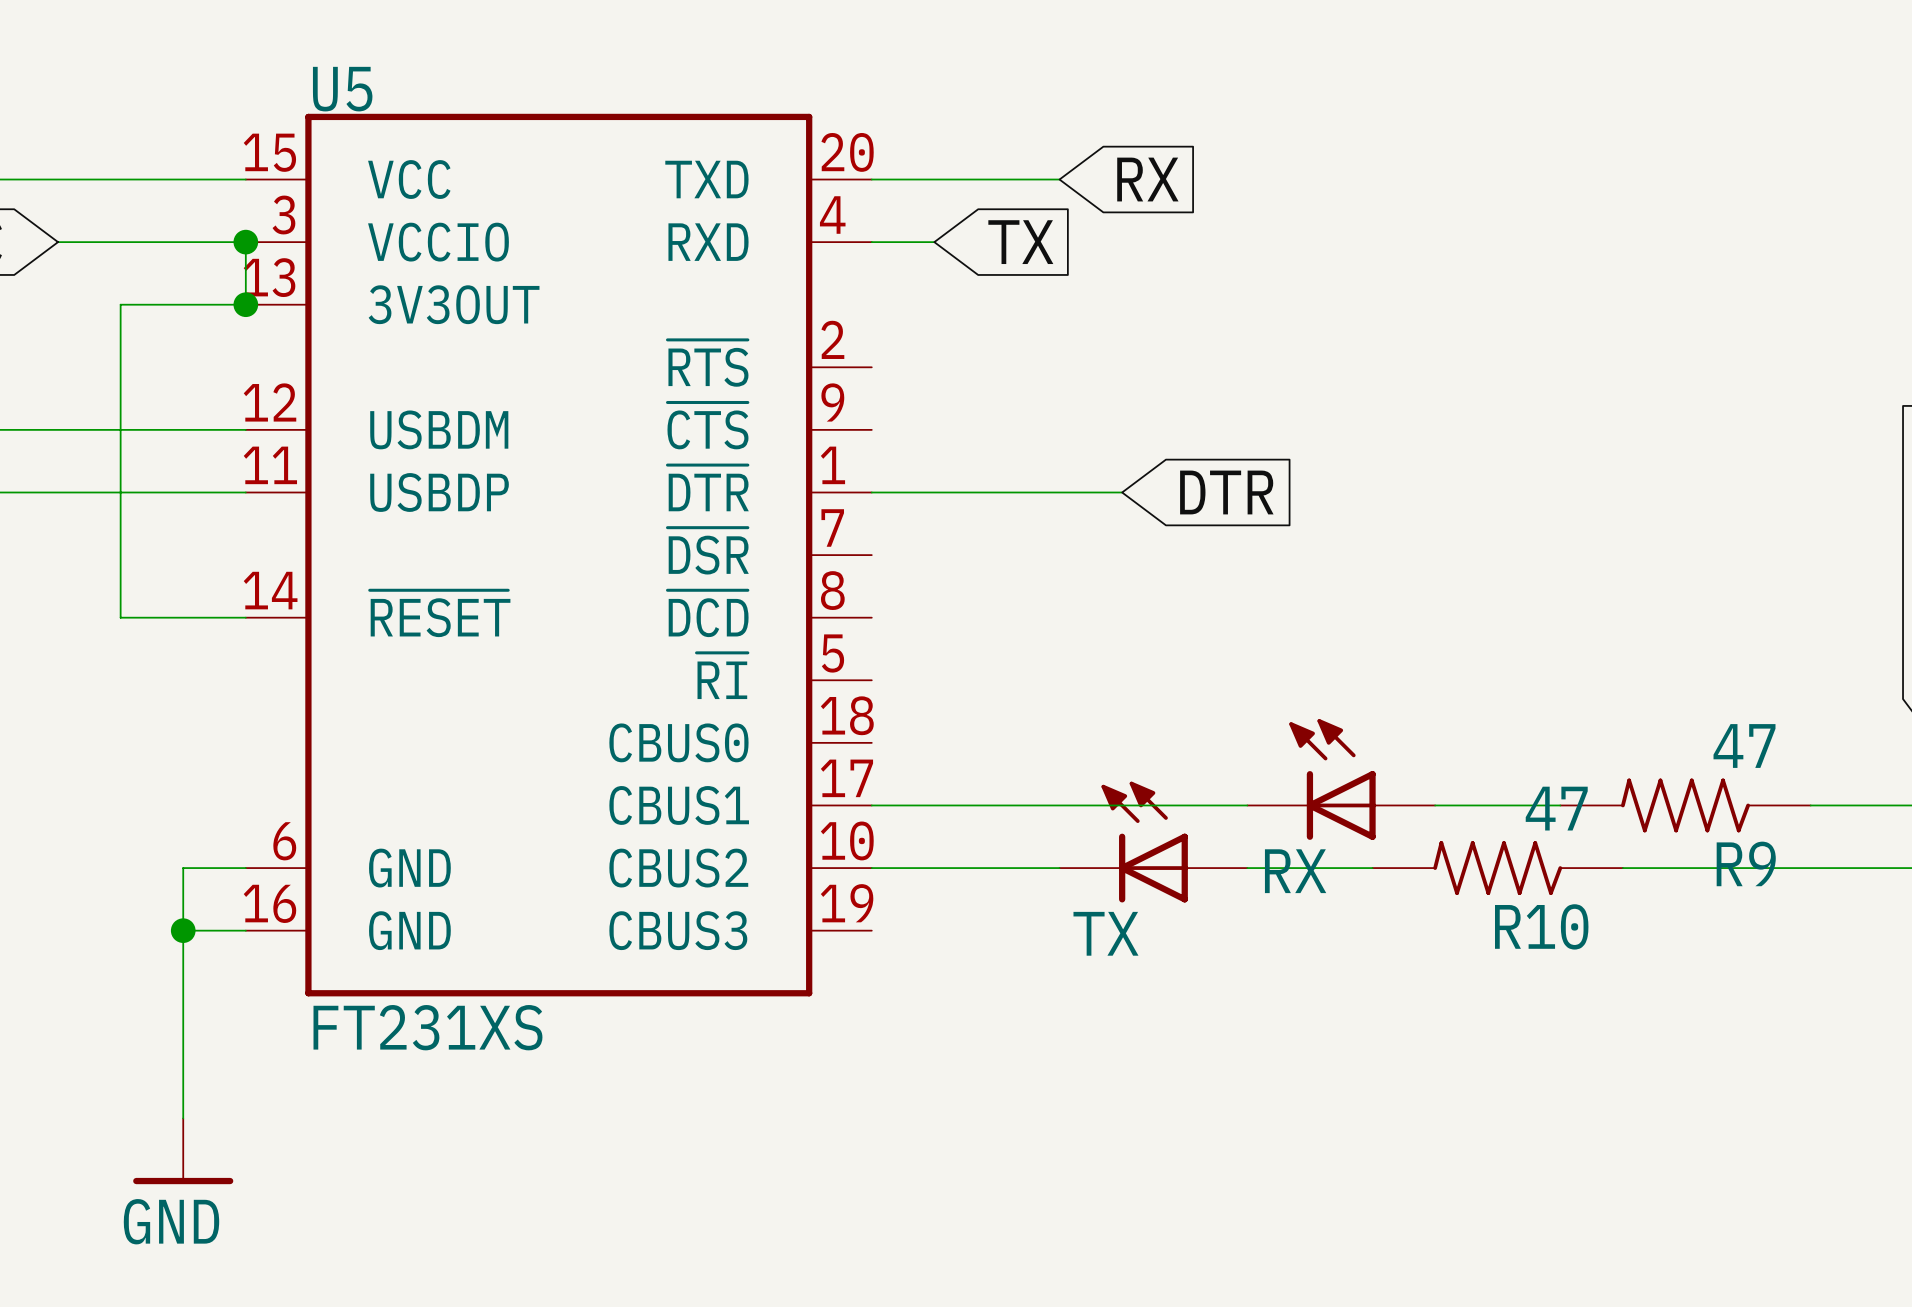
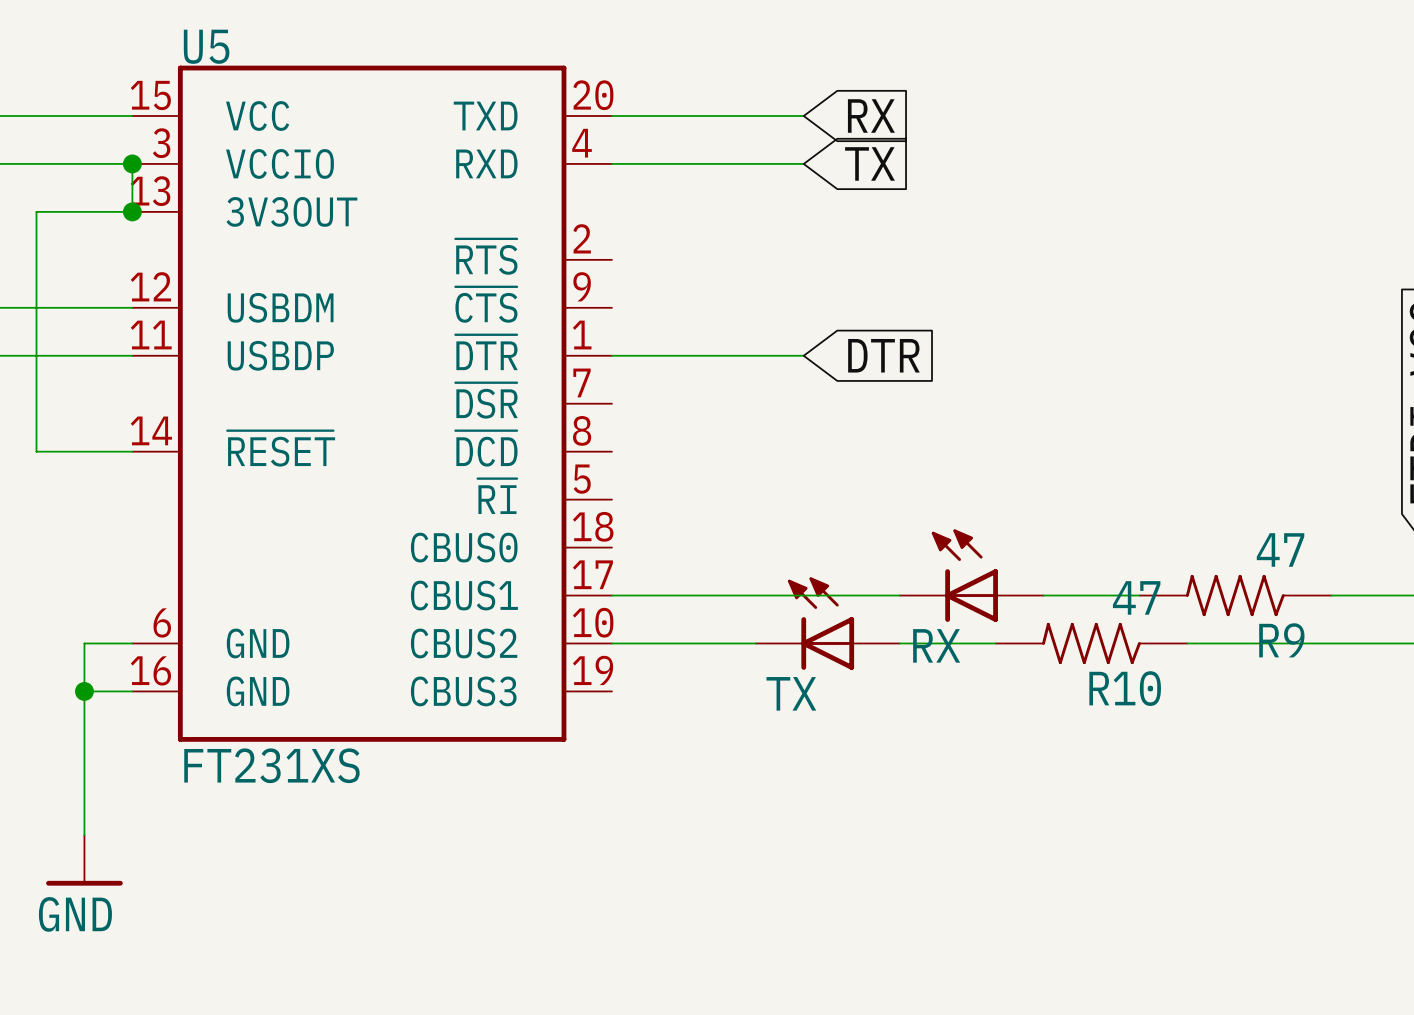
wire: none -> (755, 116) (803, 116)
global label position: RX (1147, 179) -> RX (871, 116)
wire: none -> (659, 163) (803, 163)
global label position: TX (1020, 242) -> TX (870, 163)

